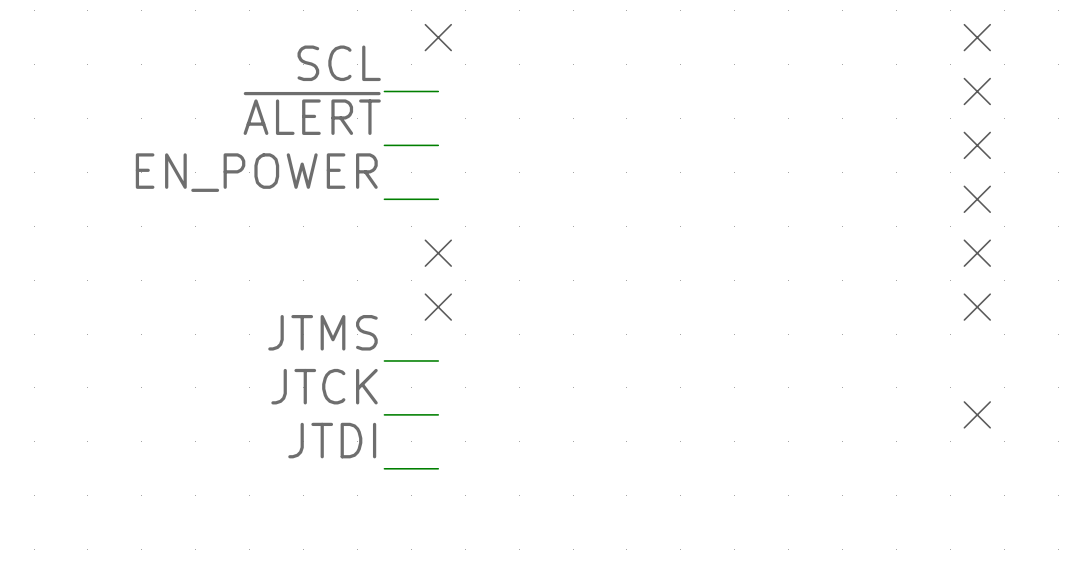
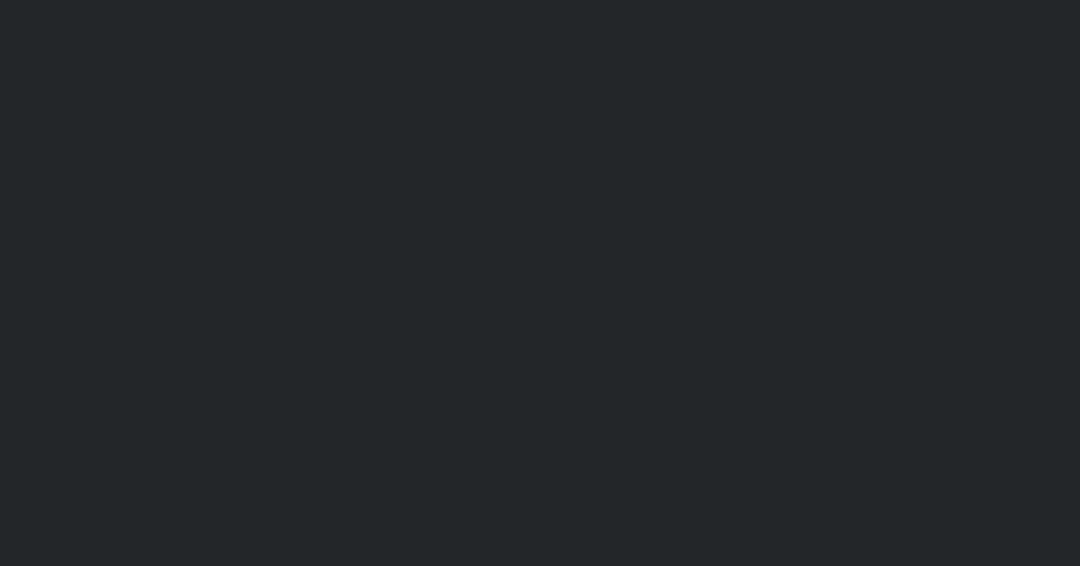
no-connect mark: (438, 37) -> none
no-connect mark: (977, 37) -> none
label: SCL (339, 63) -> none
wire: (384, 91) (438, 91) -> none
no-connect mark: (977, 91) -> none
label: ~{ALERT} (312, 113) -> none
wire: (384, 145) (438, 145) -> none
no-connect mark: (977, 145) -> none
label: EN_POWER (256, 172) -> none
wire: (384, 199) (438, 199) -> none
no-connect mark: (977, 199) -> none
no-connect mark: (438, 253) -> none
no-connect mark: (977, 253) -> none
no-connect mark: (438, 307) -> none
no-connect mark: (977, 307) -> none
label: JTMS (322, 332) -> none
wire: (384, 360) (438, 360) -> none
label: JTCK (324, 386) -> none
wire: (384, 414) (438, 414) -> none
no-connect mark: (977, 414) -> none
label: JTDI (332, 440) -> none
wire: (384, 468) (438, 468) -> none

